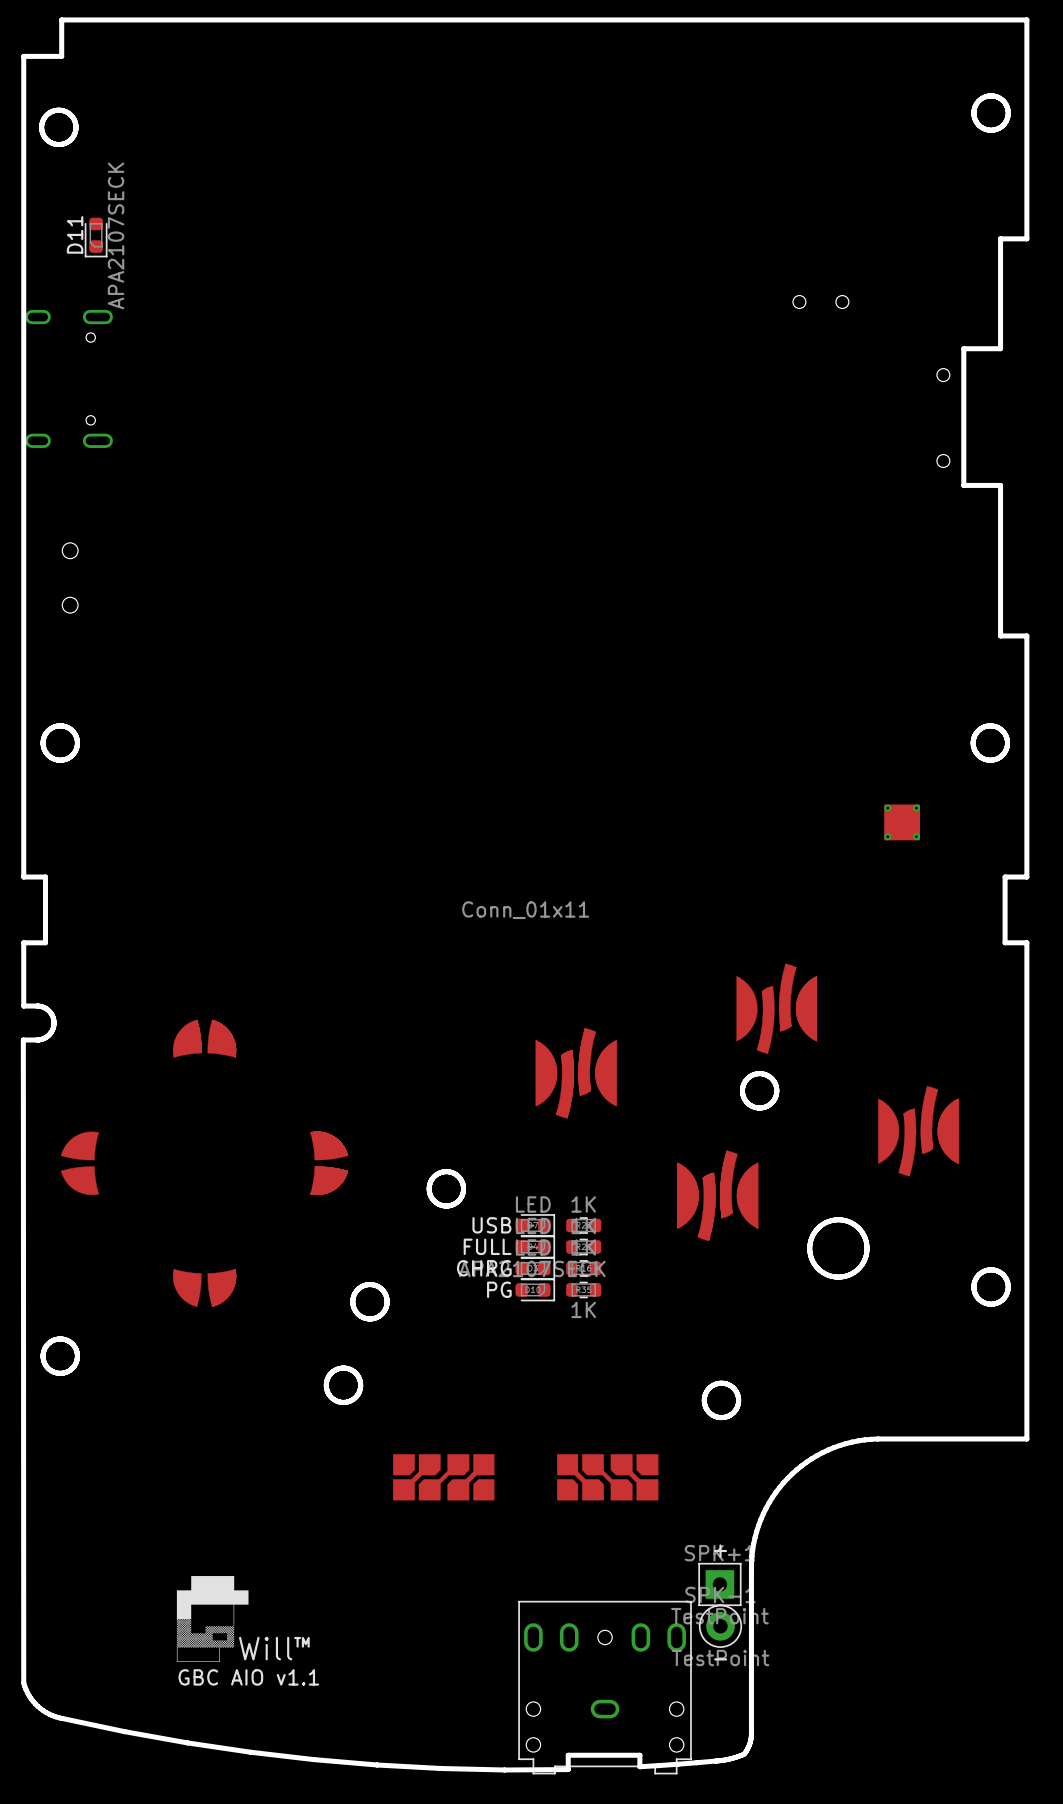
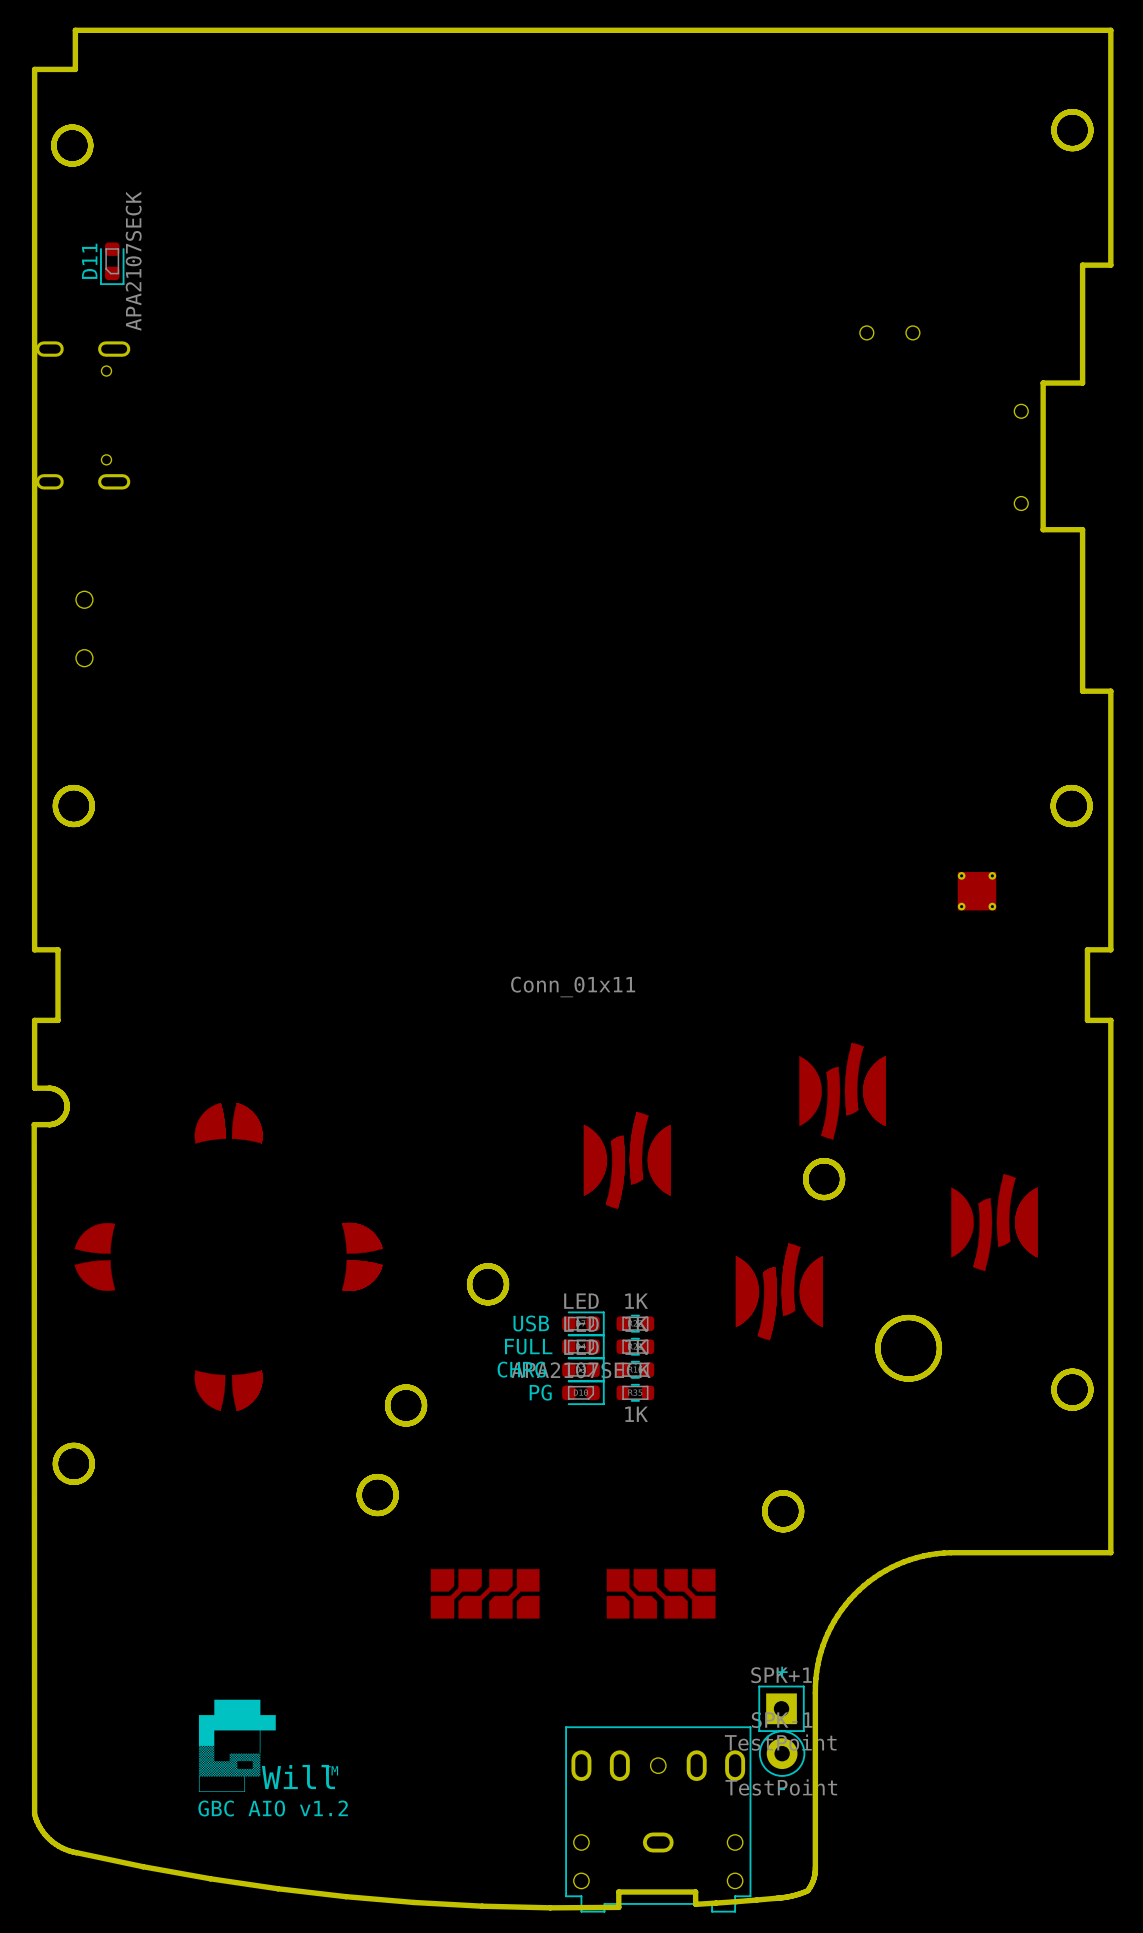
text: GBC AIO v1.1 (248, 1677) -> GBC AIO v1.2 (273, 1808)

